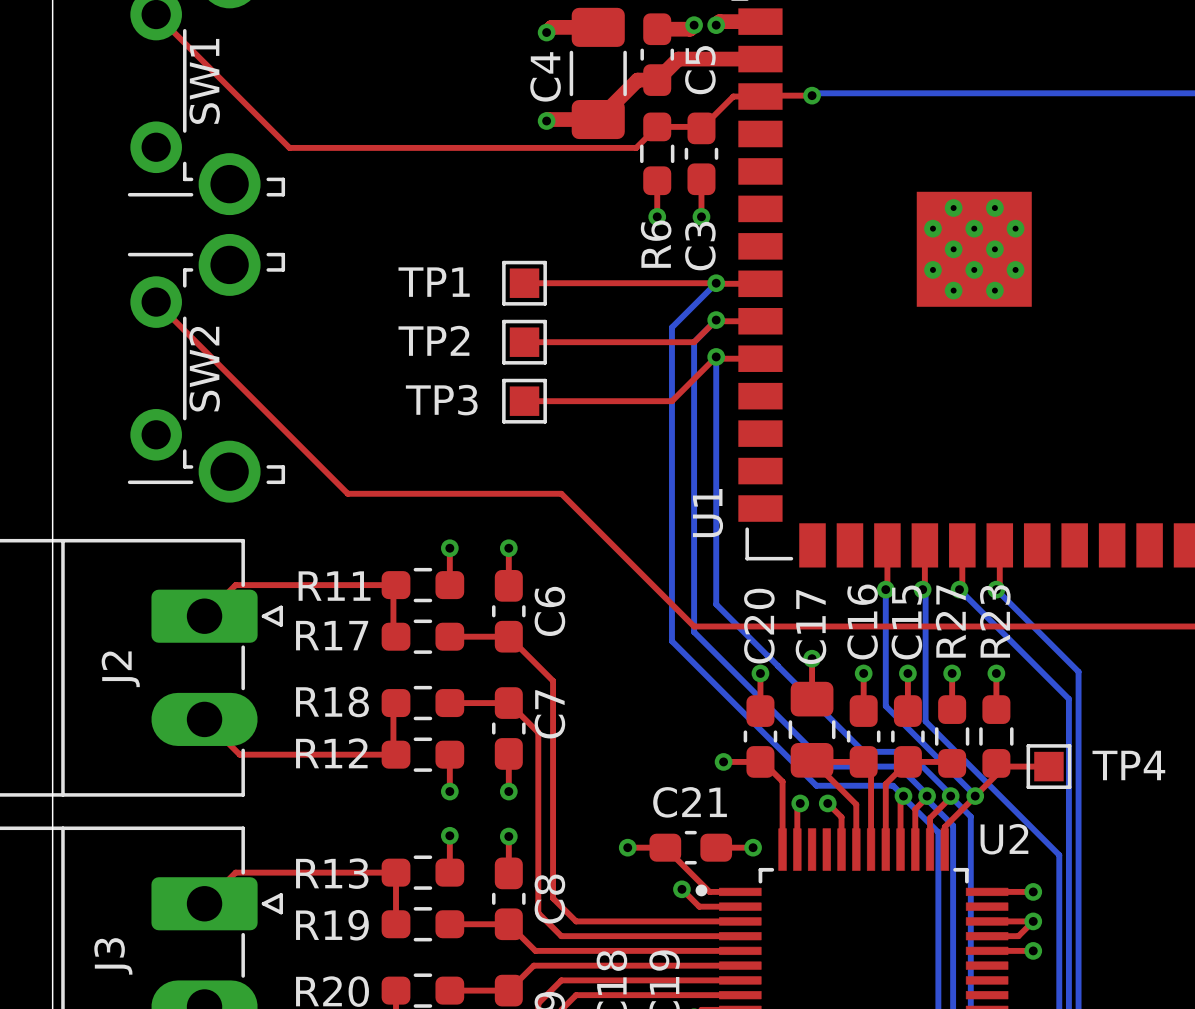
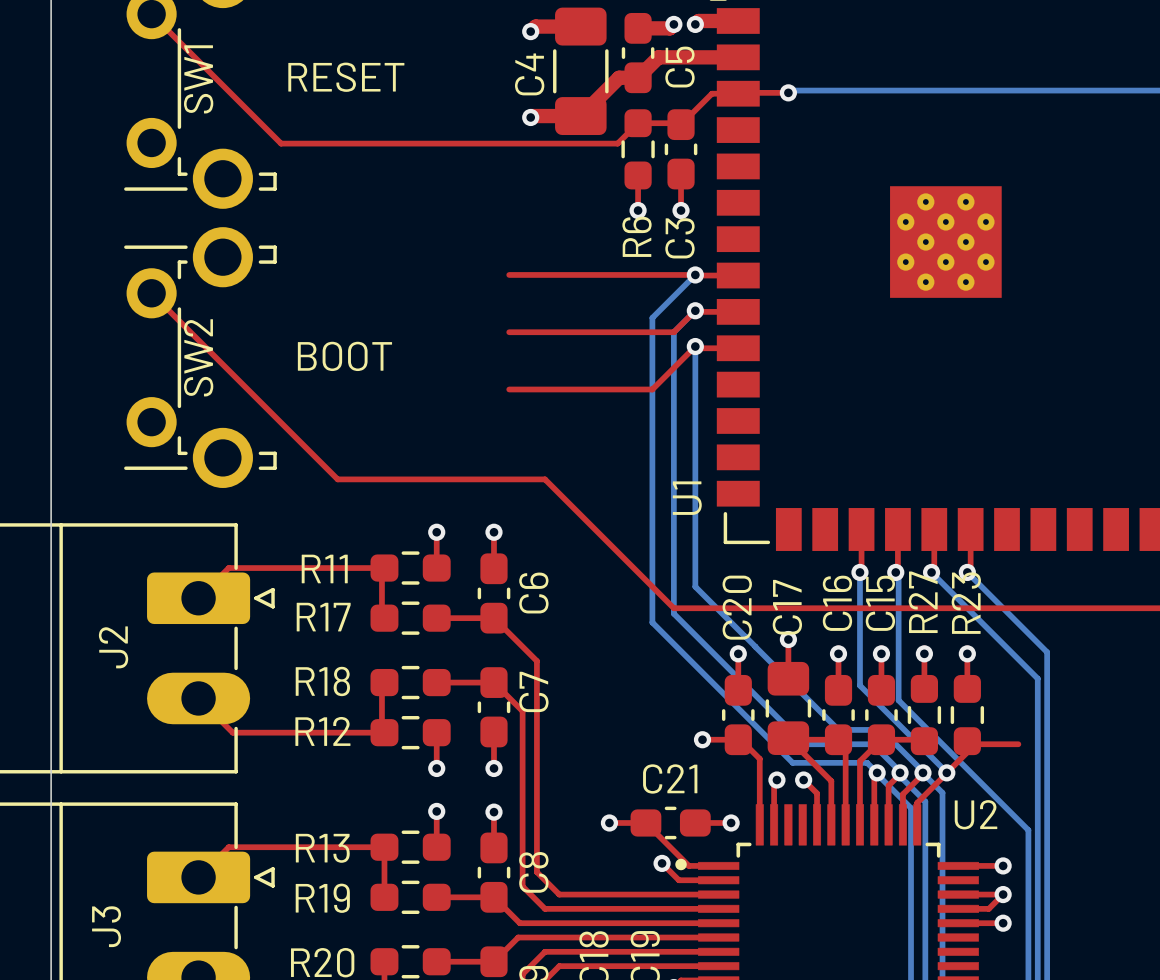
text: none -> RESET (346, 77)
TP1: (524, 283) -> none
TP2: (524, 342) -> none
text: none -> BOOT (344, 356)
TP3: (524, 401) -> none
TP4: (1048, 766) -> none

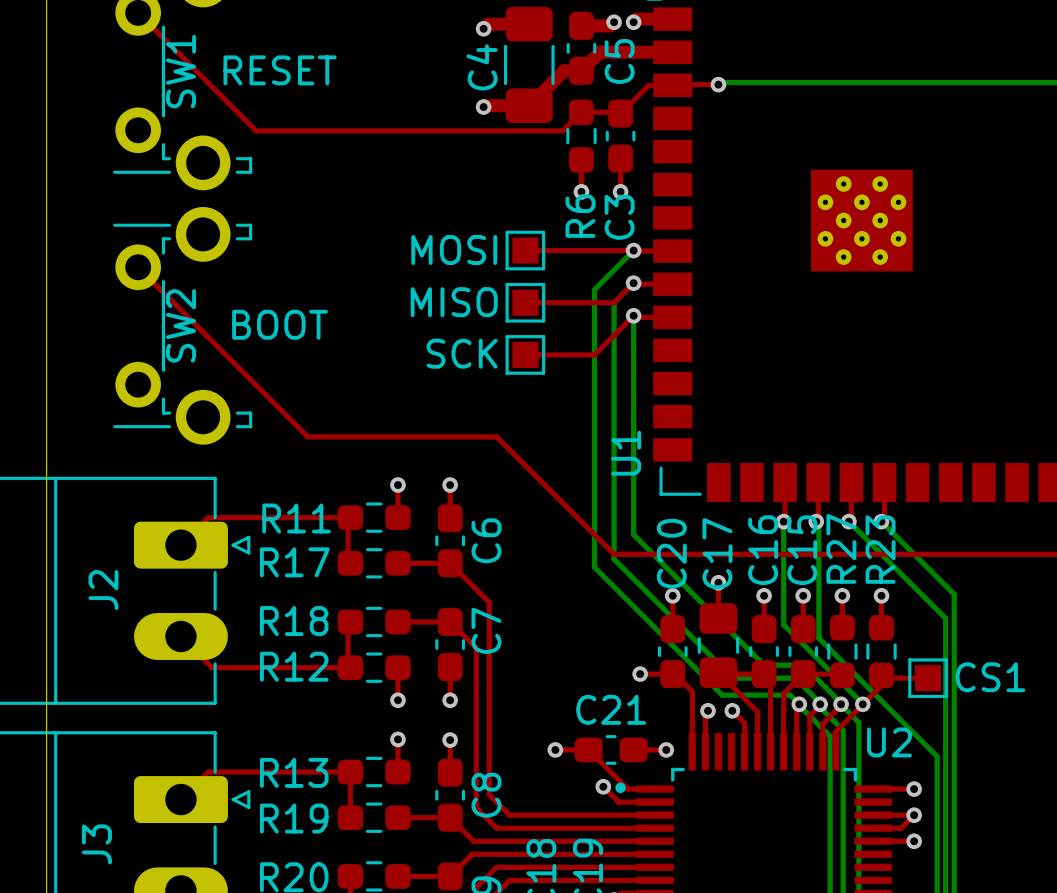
text position: RESET (346, 77) -> RESET (280, 70)
top track: (509, 274) (576, 274) -> none
part: none -> MOSI (525, 250)
top track: (509, 332) (576, 332) -> none
part: none -> MISO (525, 302)
text position: BOOT (344, 356) -> BOOT (280, 324)
top track: (509, 389) (576, 389) -> none
part: none -> SCK (525, 354)
part: none -> CS1 (928, 678)

